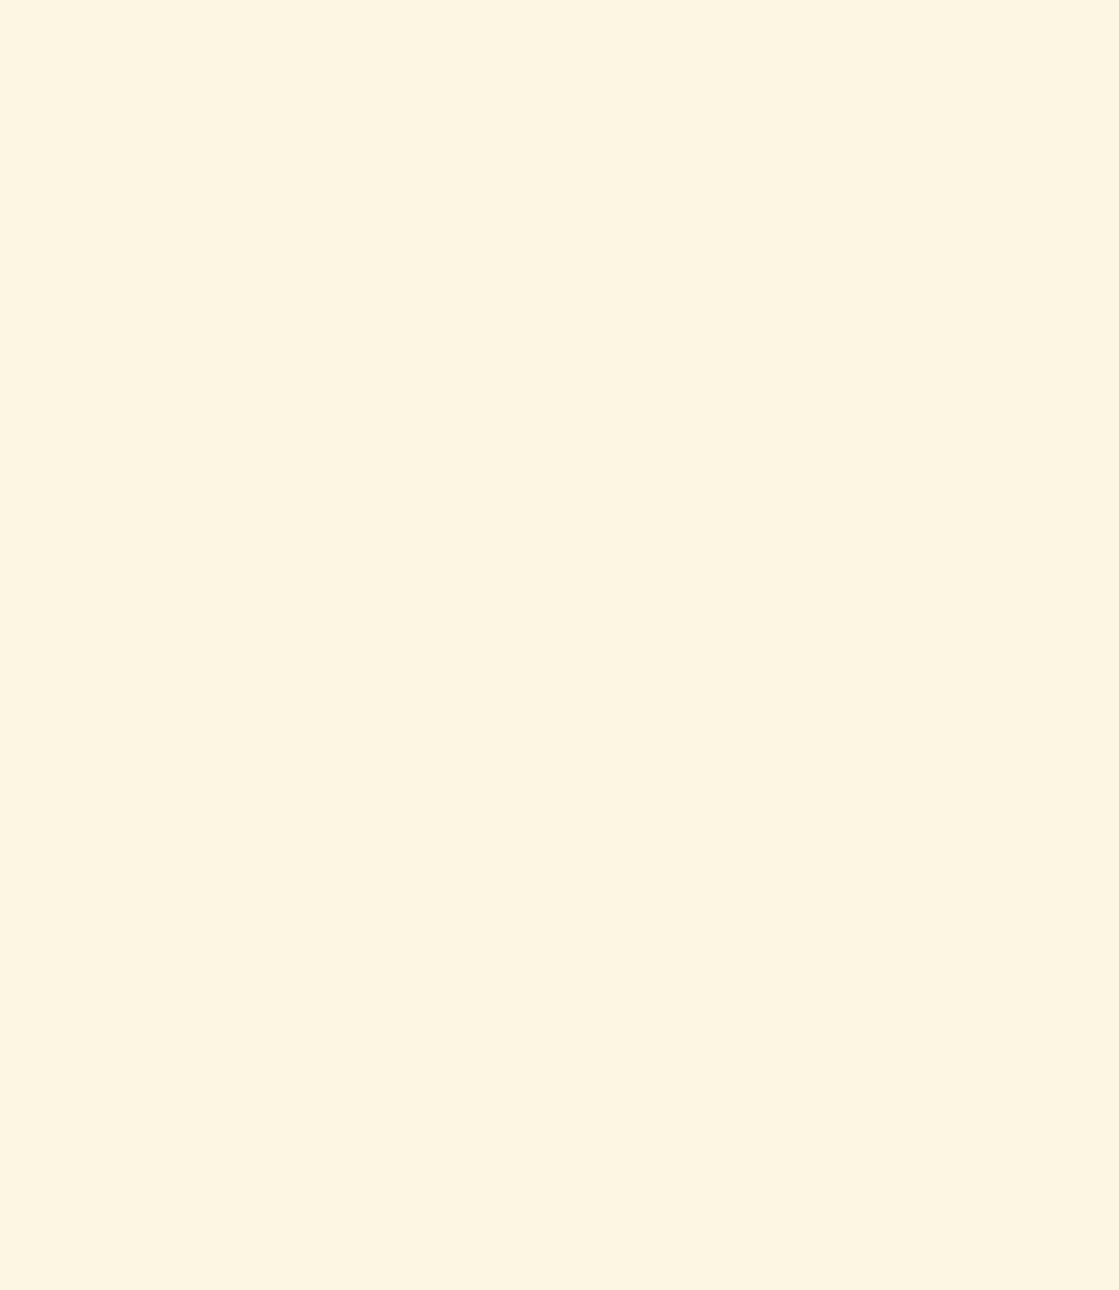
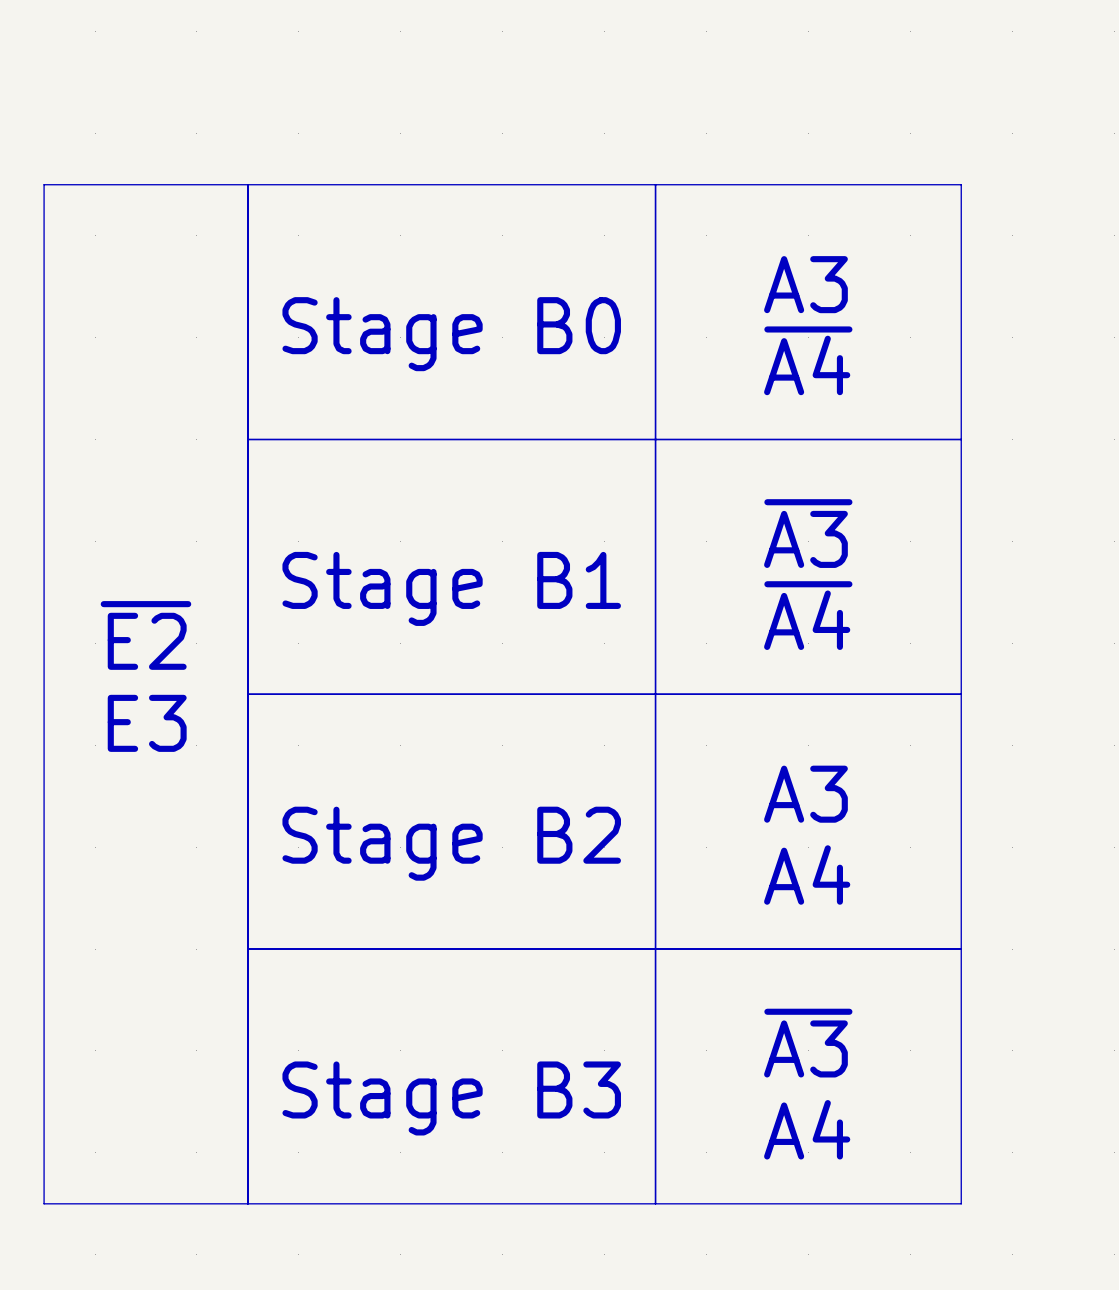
line: none -> (44, 184) (961, 184) (961, 1203) (44, 1203) (44, 184)
line: none -> (247, 184) (247, 1203)
line: none -> (655, 184) (655, 1203)
text: none -> A3 (805, 284)
text: none -> Stage B0 (451, 334)
text: none -> ~{A4} (808, 360)
line: none -> (247, 439) (961, 439)
text: none -> ~{A3} (808, 533)
text: none -> Stage B1 (451, 588)
text: none -> ~{A4} (808, 615)
text: none -> ~{E2} (145, 635)
line: none -> (247, 694) (961, 694)
text: none -> E3 (147, 723)
text: none -> A3 (805, 794)
text: none -> Stage B2 (451, 843)
text: none -> A4 (807, 875)
line: none -> (247, 949) (961, 949)
text: none -> ~{A3} (808, 1043)
text: none -> Stage B3 (451, 1098)
text: none -> A4 (807, 1129)

